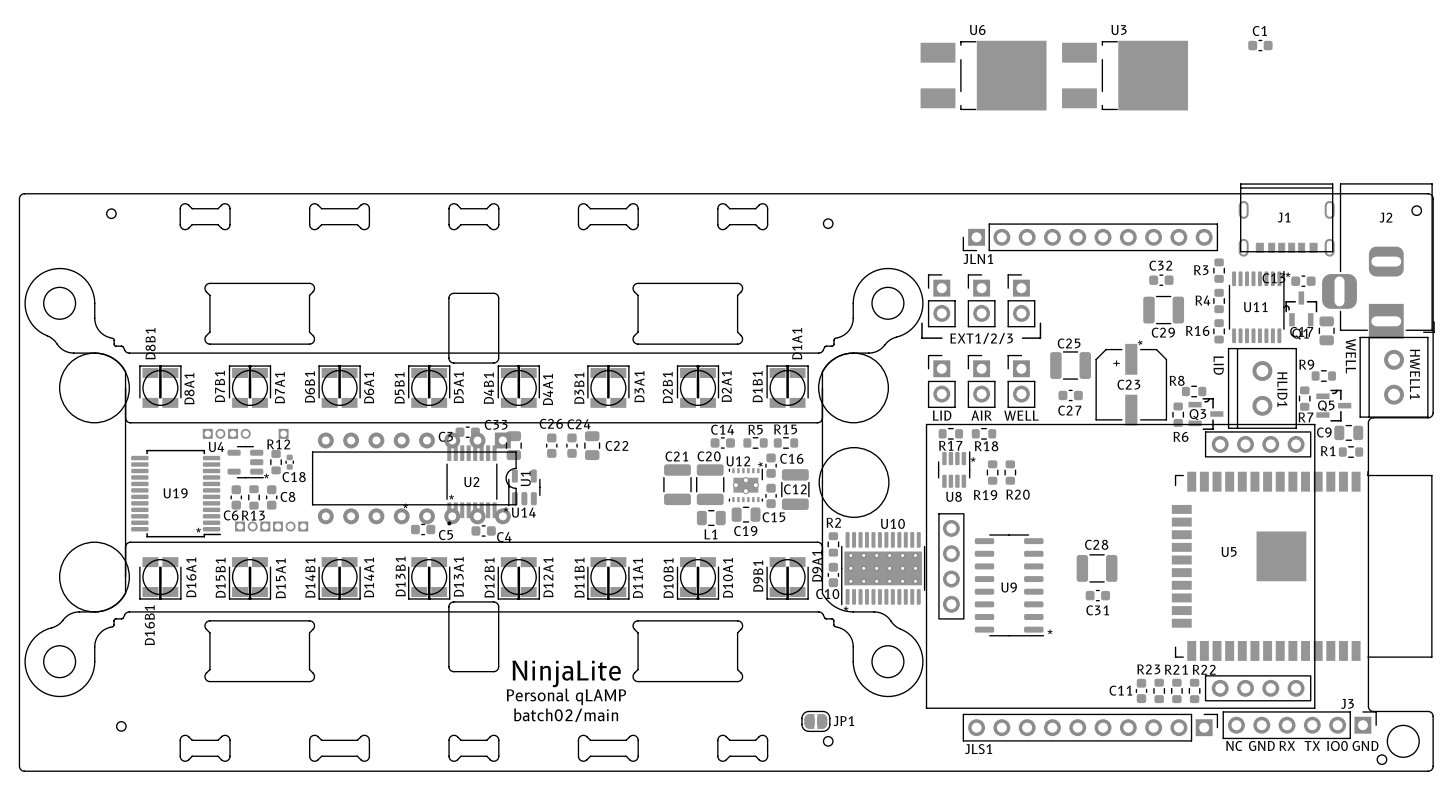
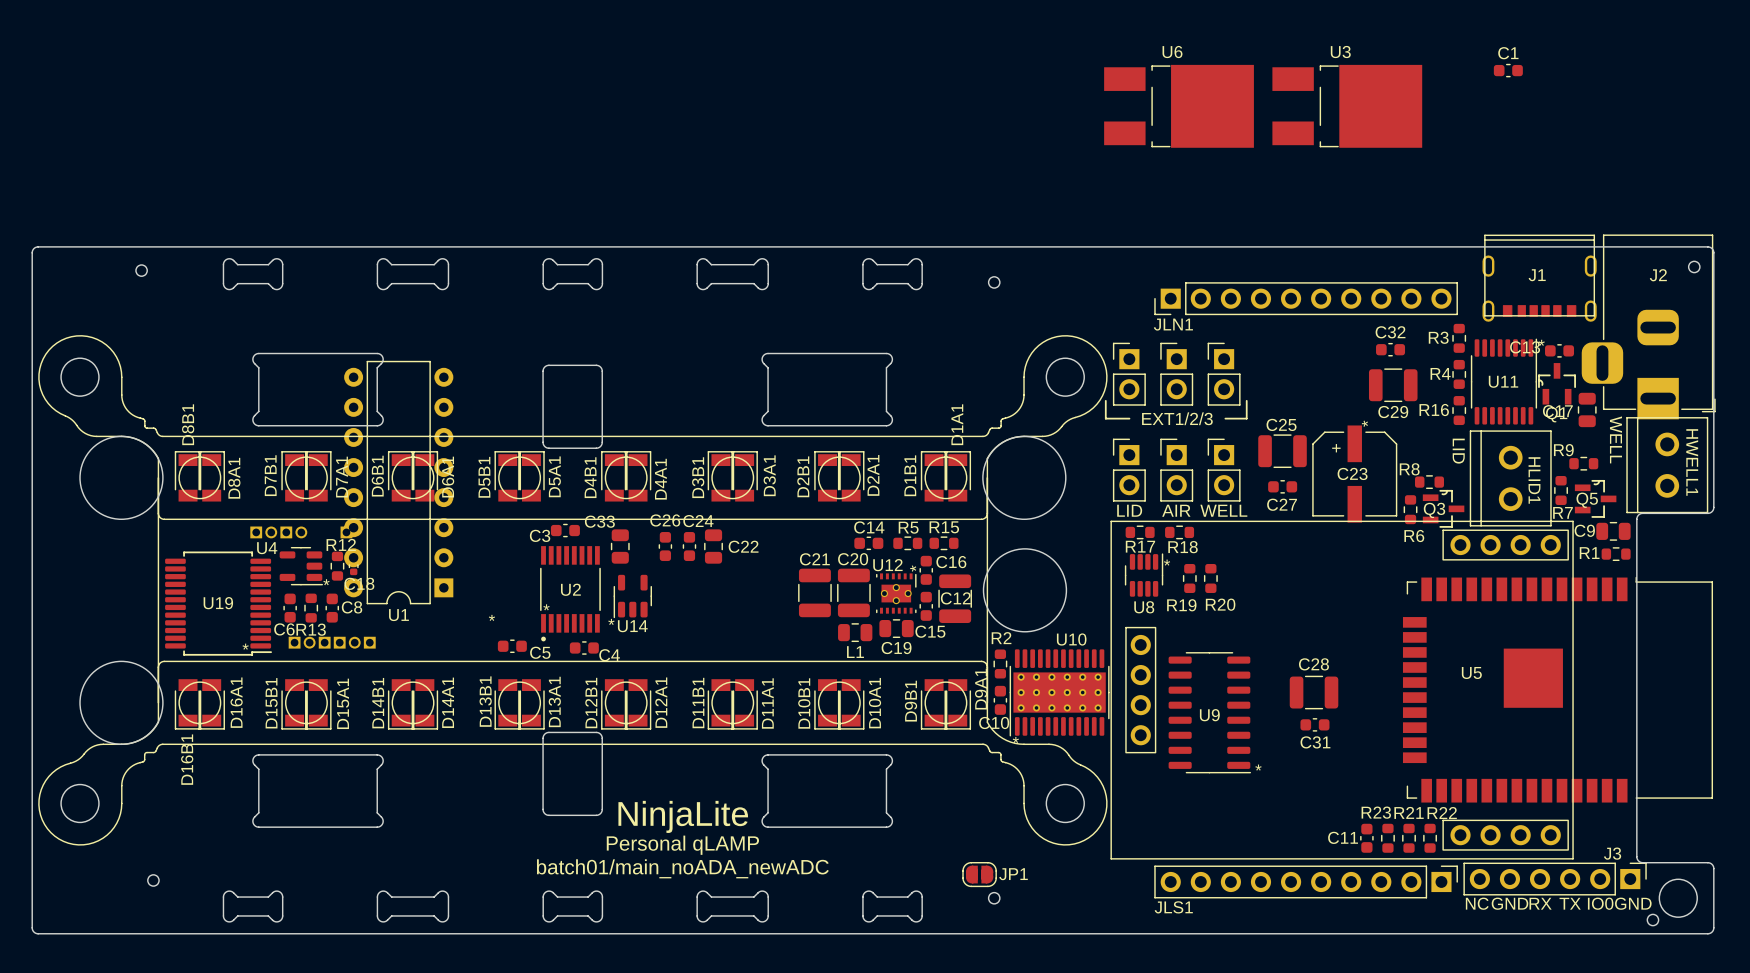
U1 rotation: 0° (414, 478) -> 90° clockwise (398, 482)
text: batch02/main (566, 715) -> batch01/main_noADA_newADC (682, 868)

